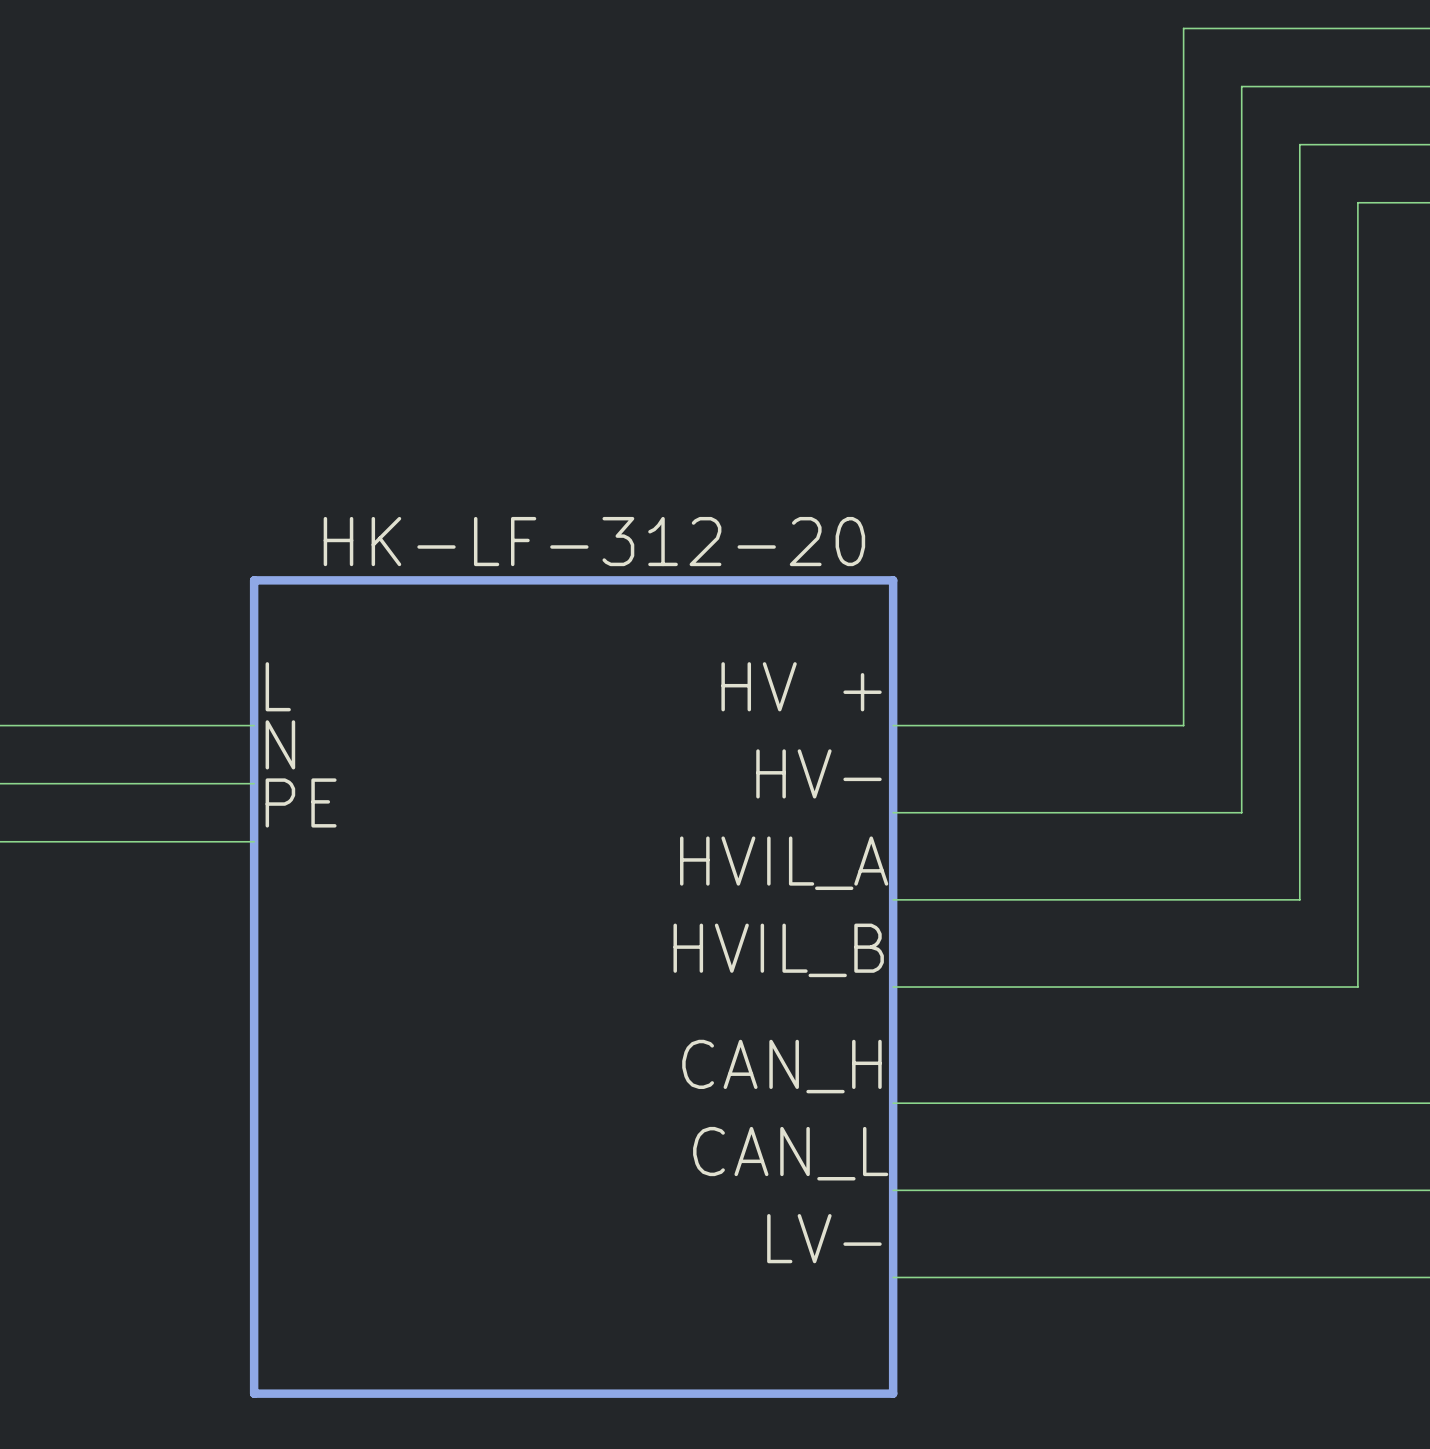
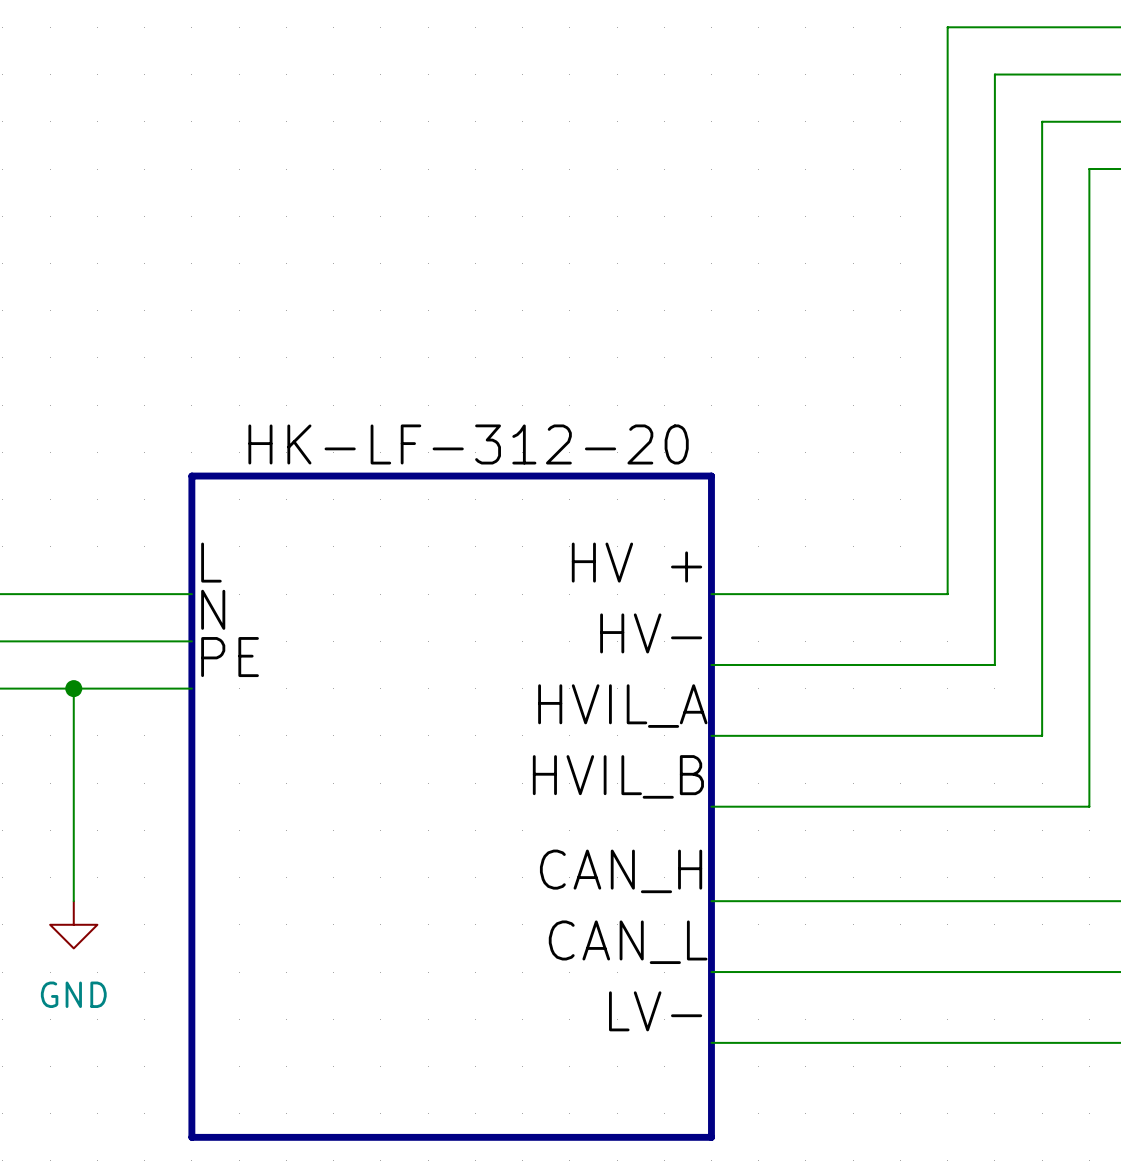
wire: none -> (73, 688) (73, 901)
junction: none -> (73, 688)
power symbol: none -> GND (73, 924)

